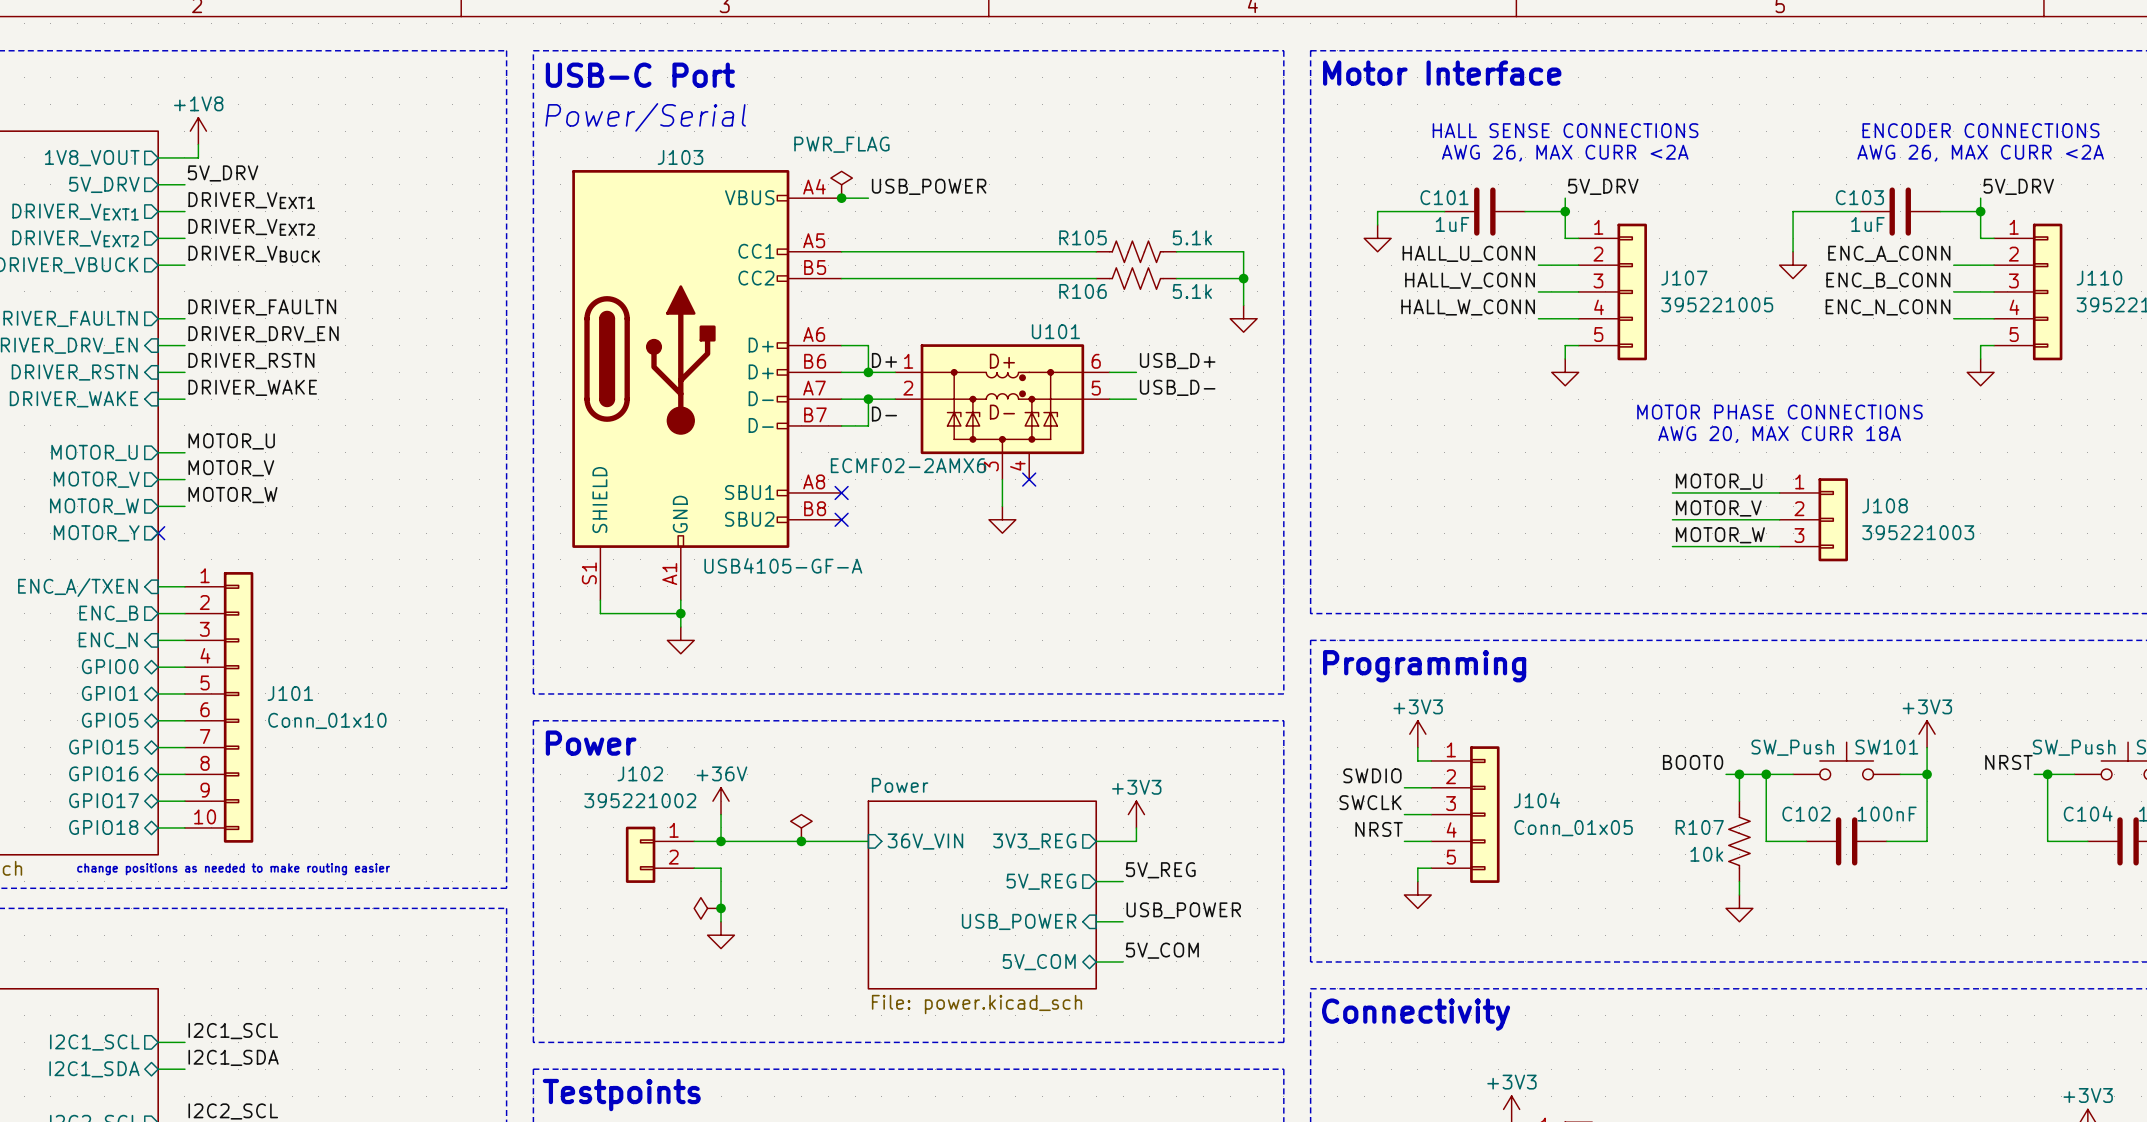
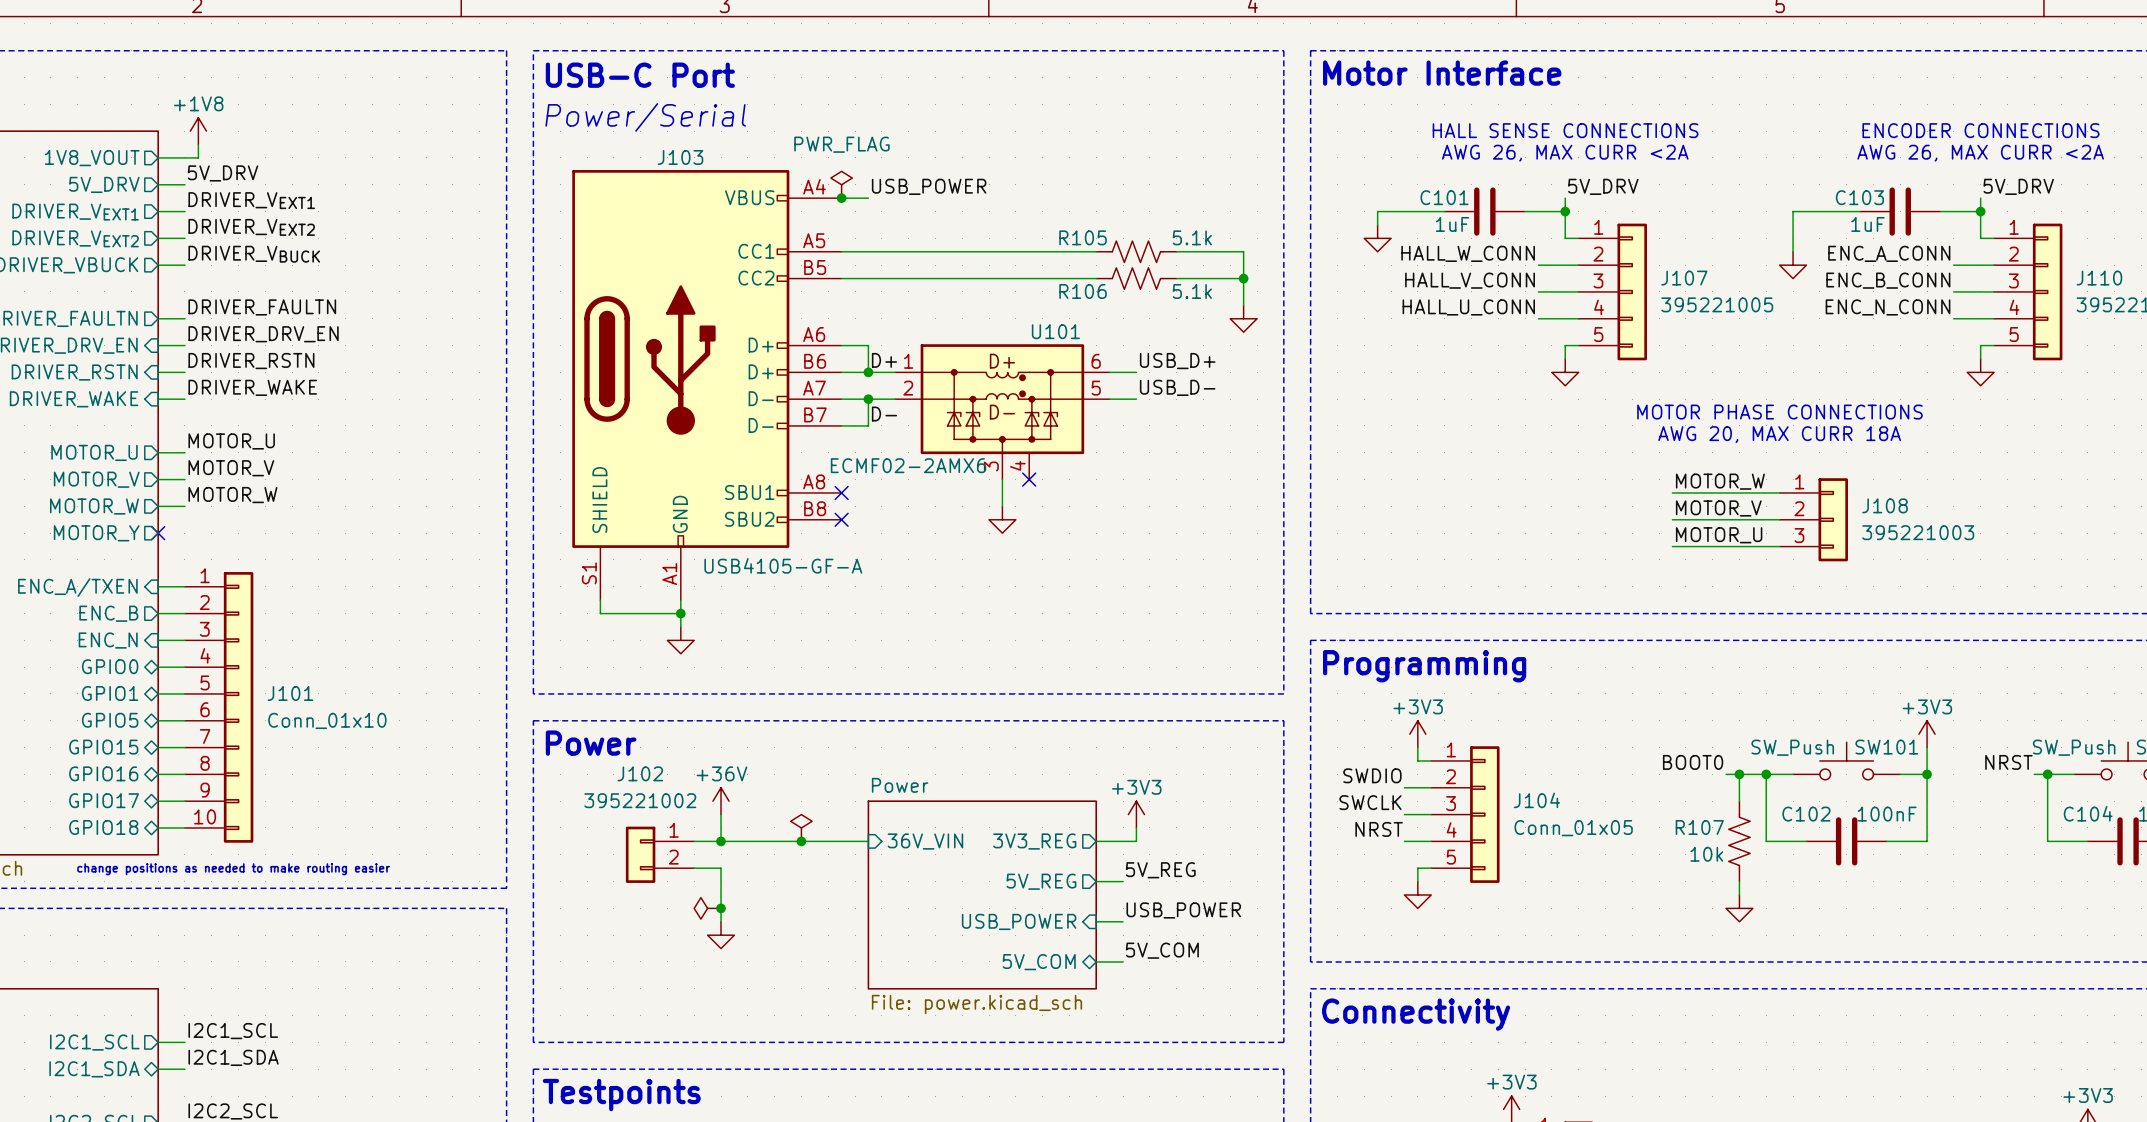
label: HALL_U_CONN (1468, 253) -> HALL_W_CONN (1468, 253)
label: HALL_W_CONN (1468, 307) -> HALL_U_CONN (1468, 307)
label: MOTOR_U (1719, 481) -> MOTOR_W (1720, 481)
label: MOTOR_W (1720, 535) -> MOTOR_U (1719, 535)

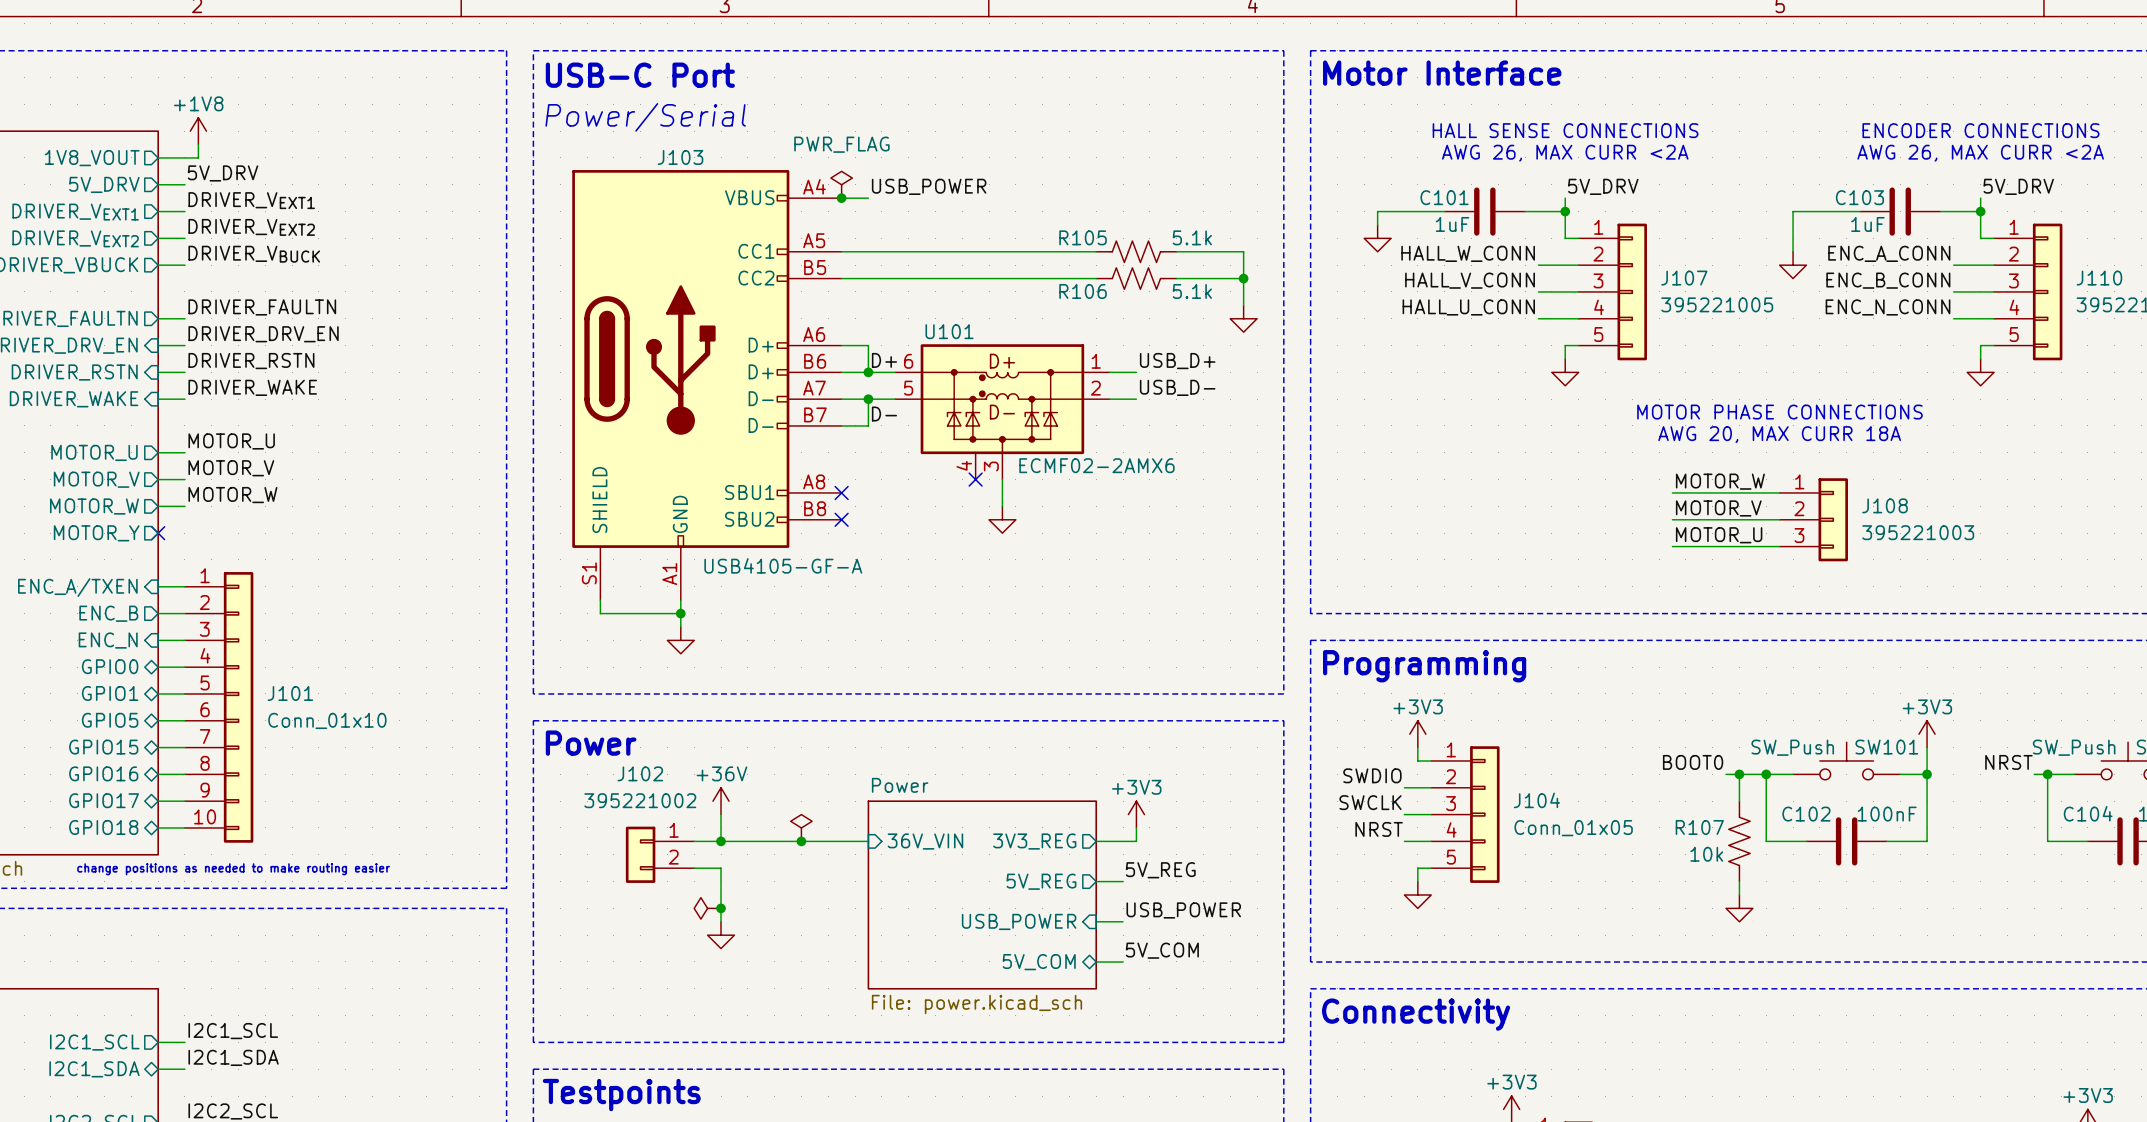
U101 flip: as is (1002, 399) -> left-right (1002, 399)
no-connect mark position: (1029, 479) -> (975, 479)

